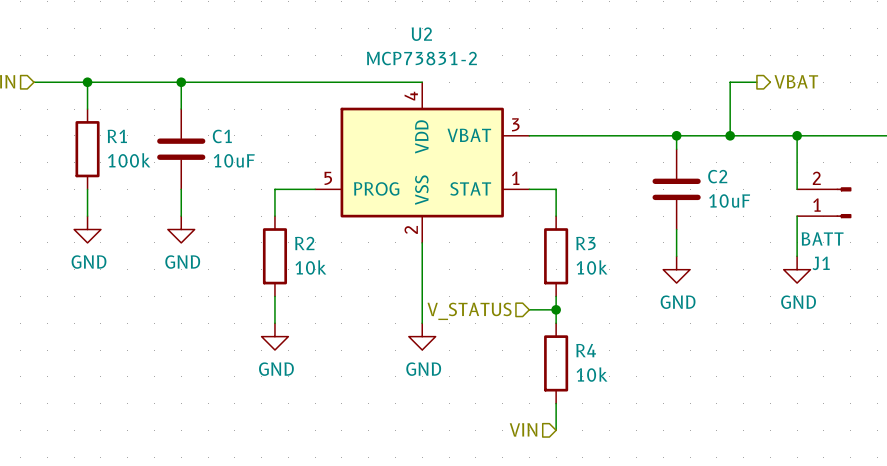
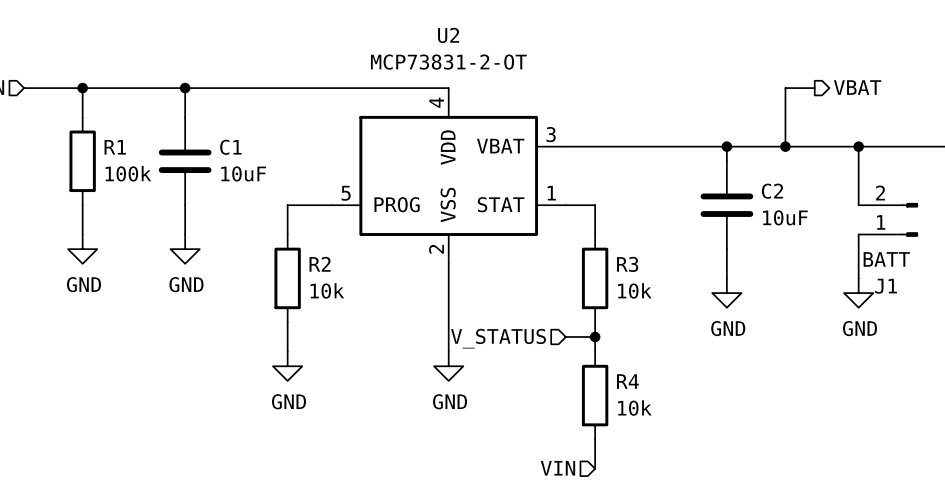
U2 value: MCP73831-2 (421, 58) -> MCP73831-2-OT (448, 62)

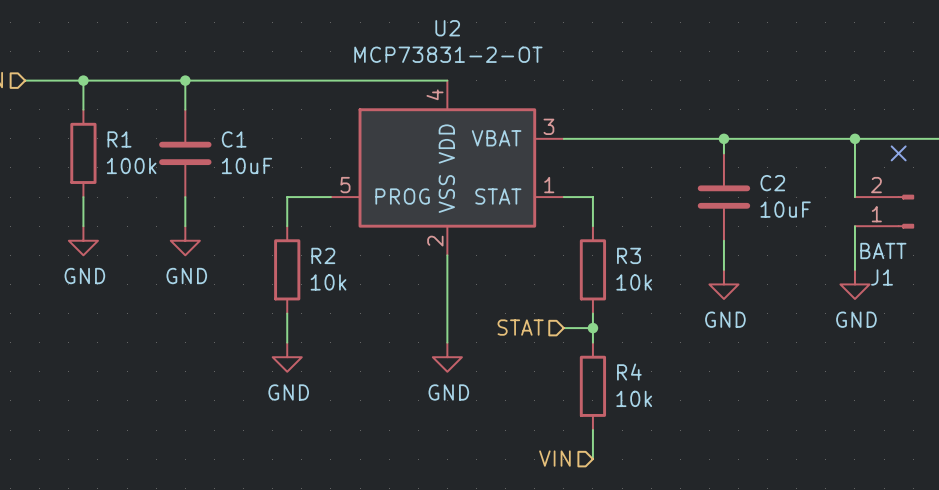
hierarchical label: VBAT (857, 87) -> none
wire: (814, 88) (785, 88) (785, 146) -> none
junction: (785, 146) -> none
no-connect mark: none -> (898, 153)
hierarchical label: V_STATUS (498, 338) -> STAT (520, 327)

